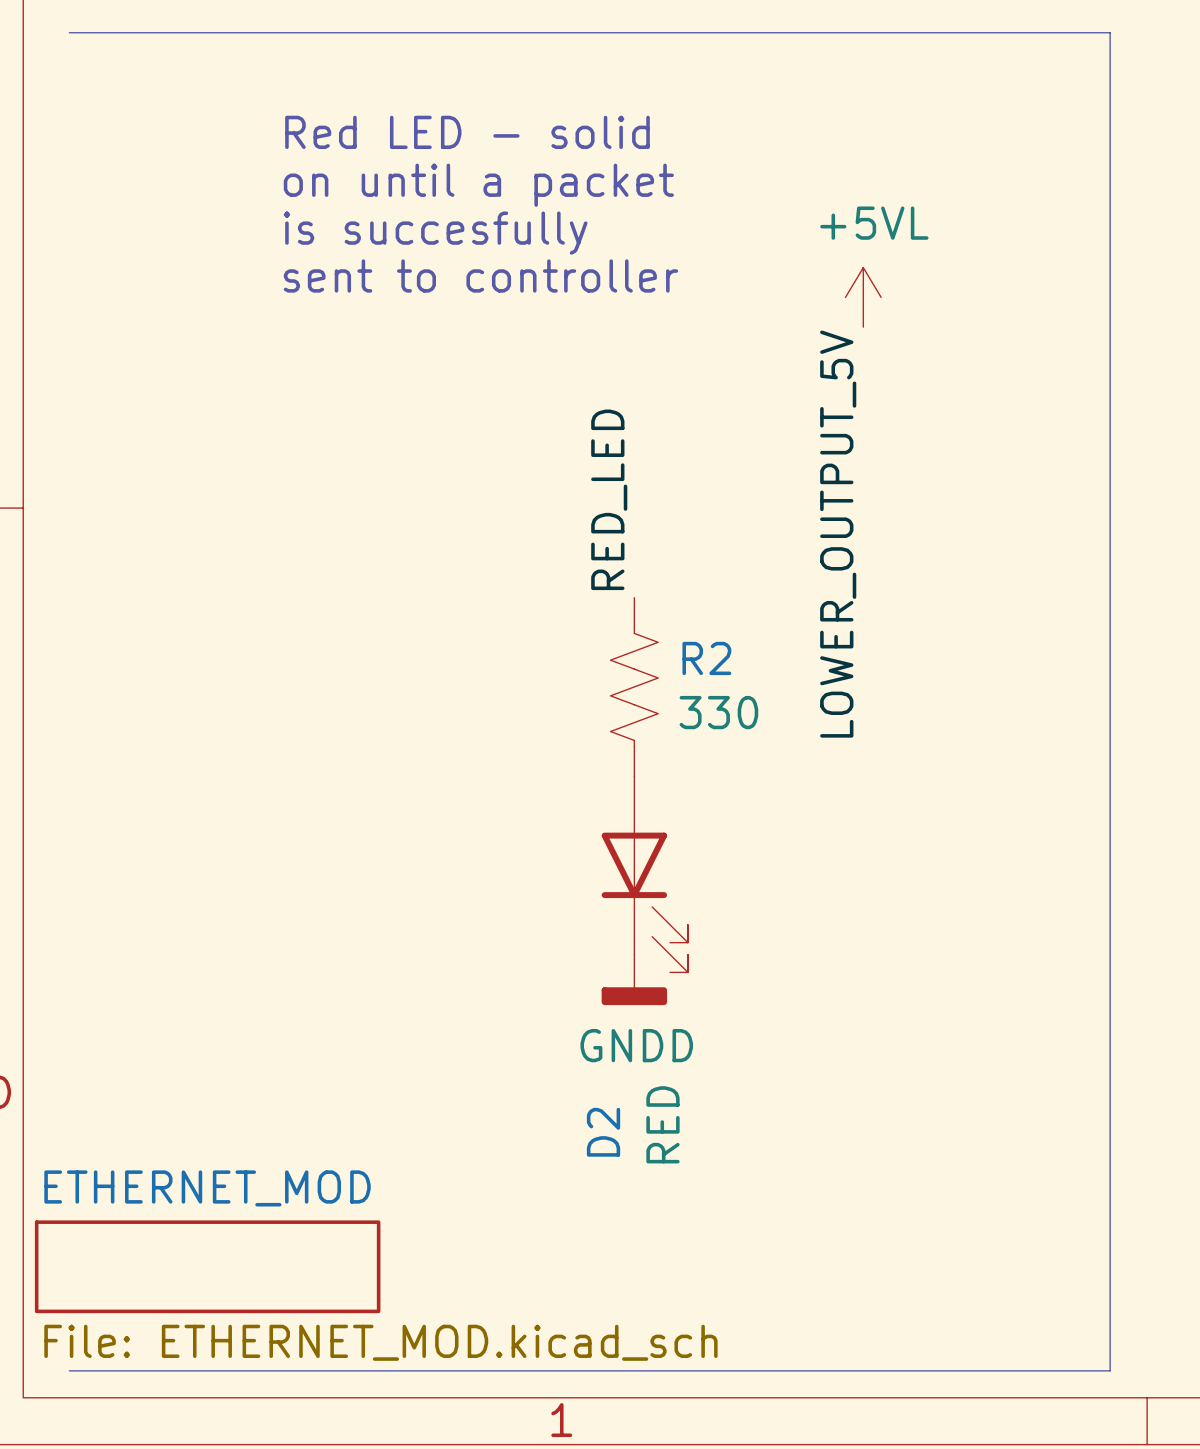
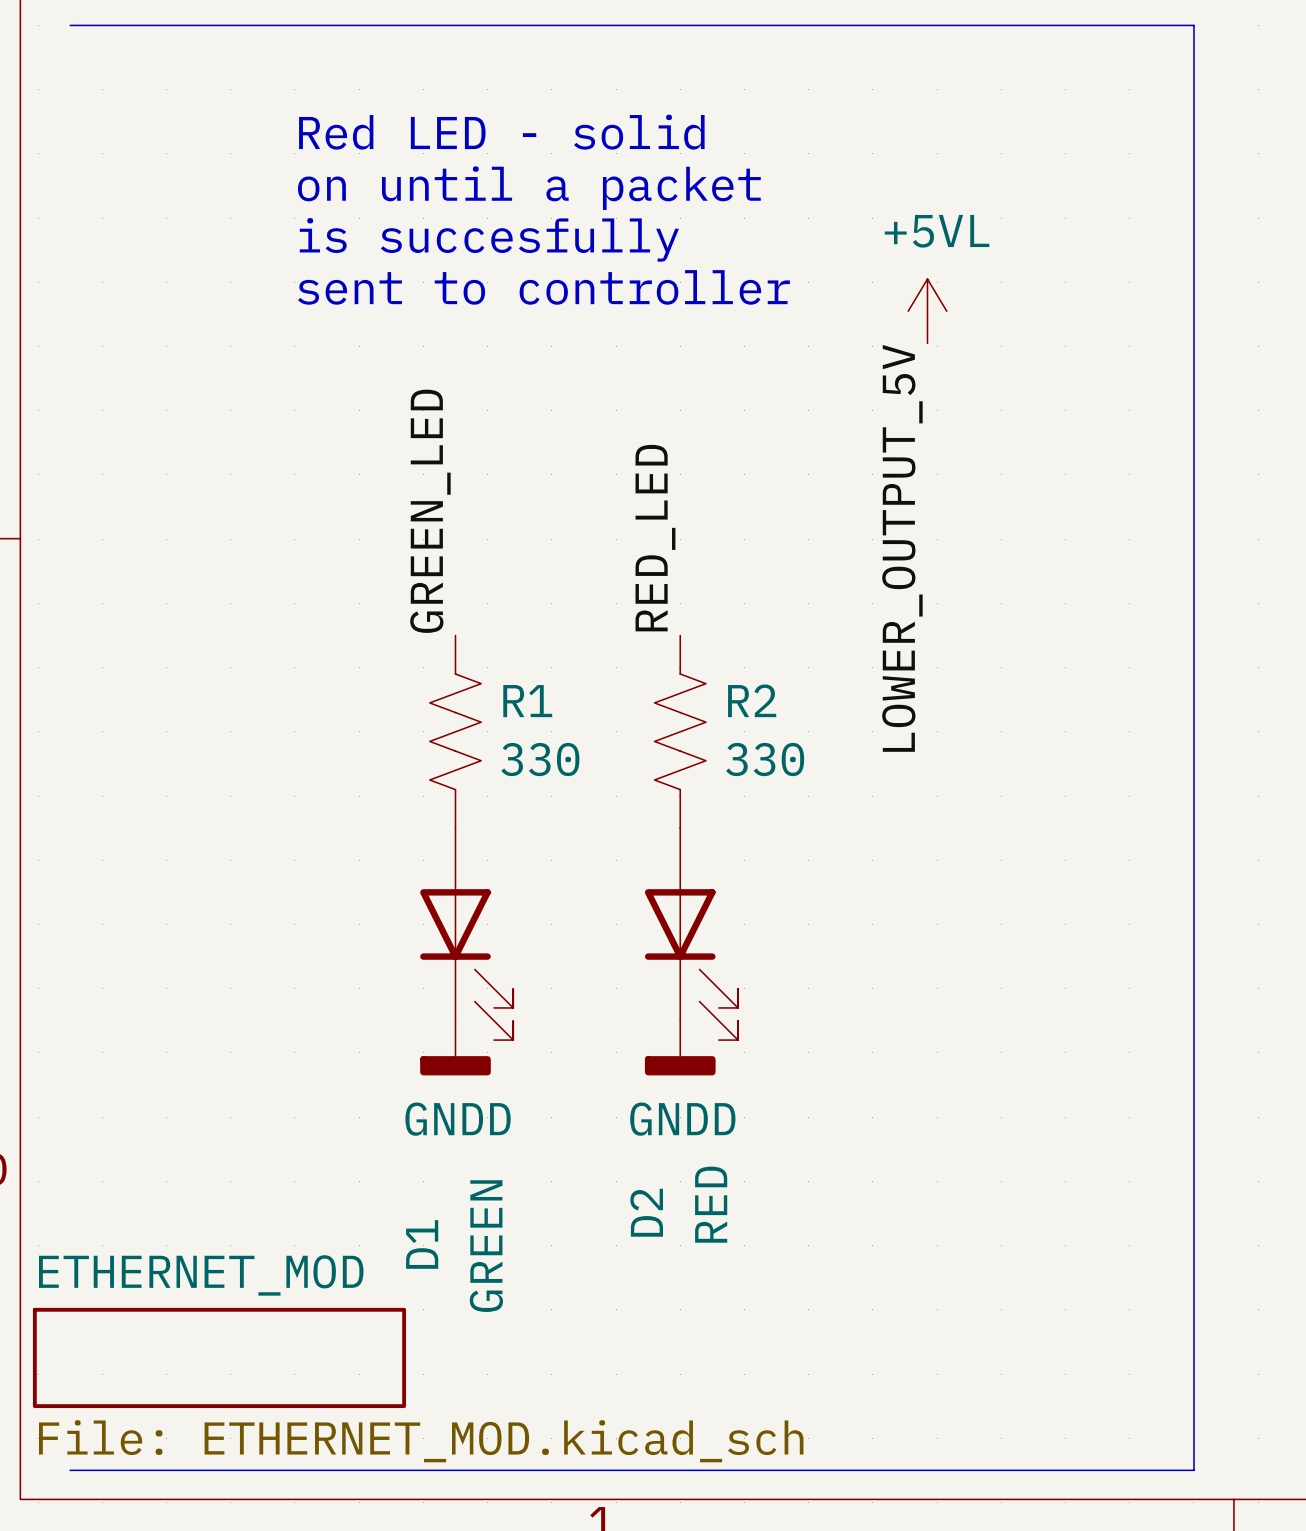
label: none -> GREEN_LED (430, 511)
R1: none -> 330 (455, 731)
D1: none -> GREEN (466, 934)
power symbol: none -> GNDD (455, 1048)

